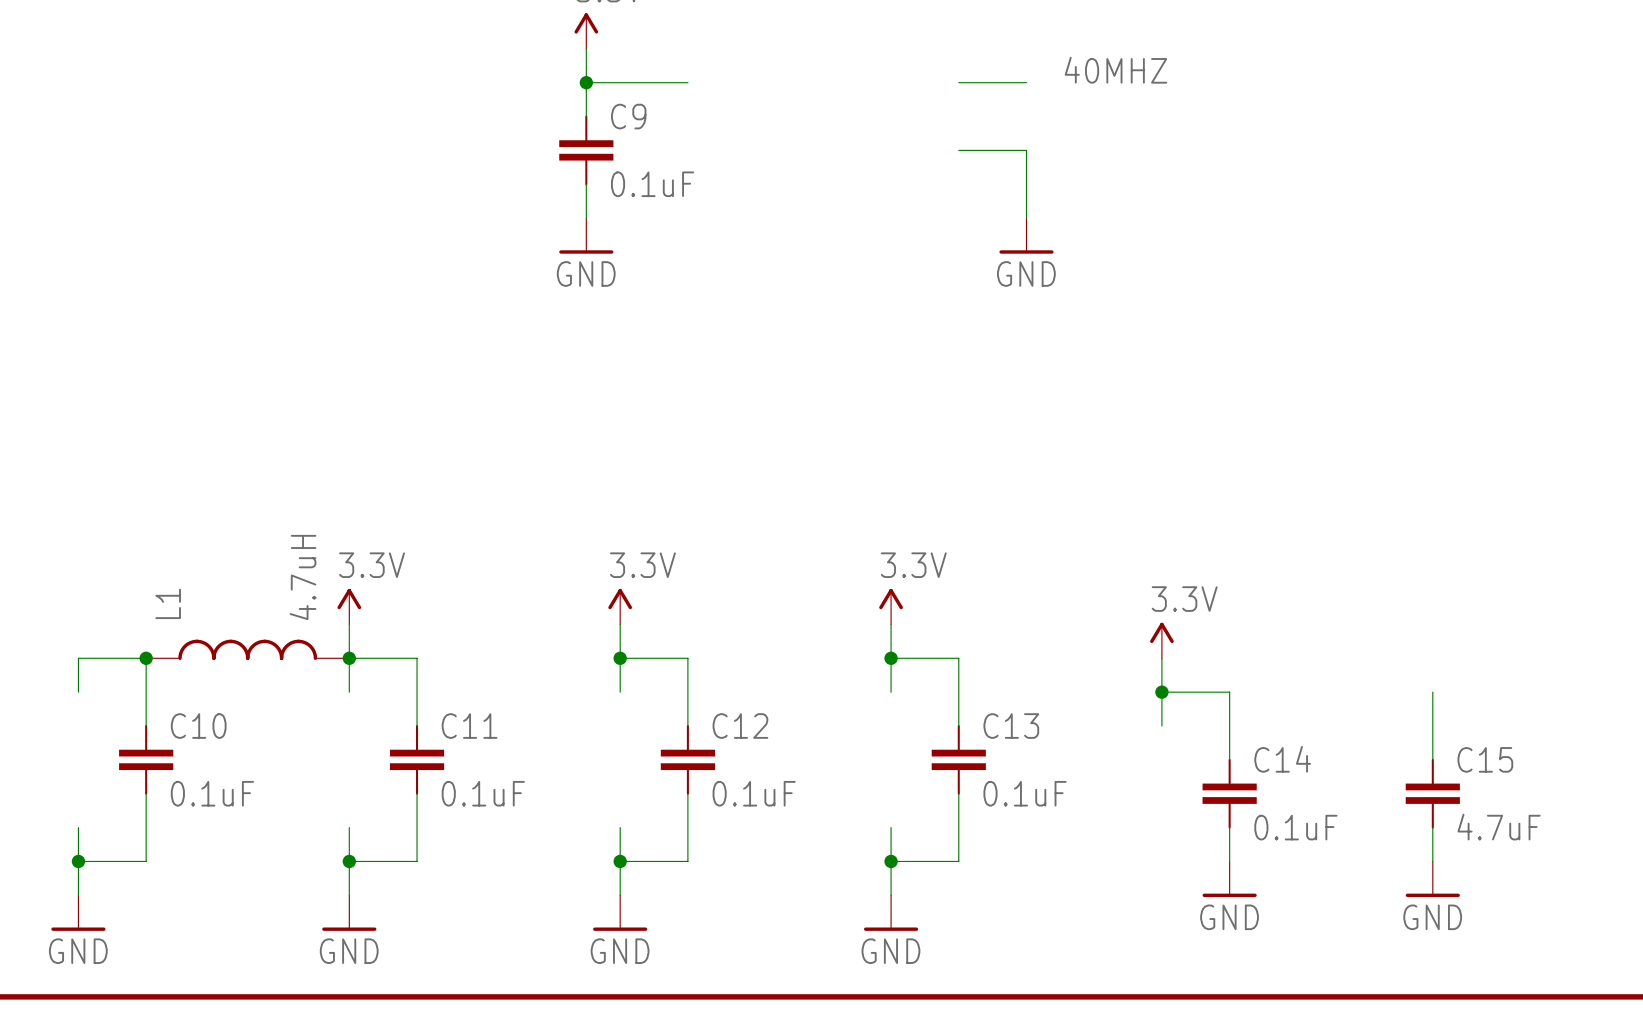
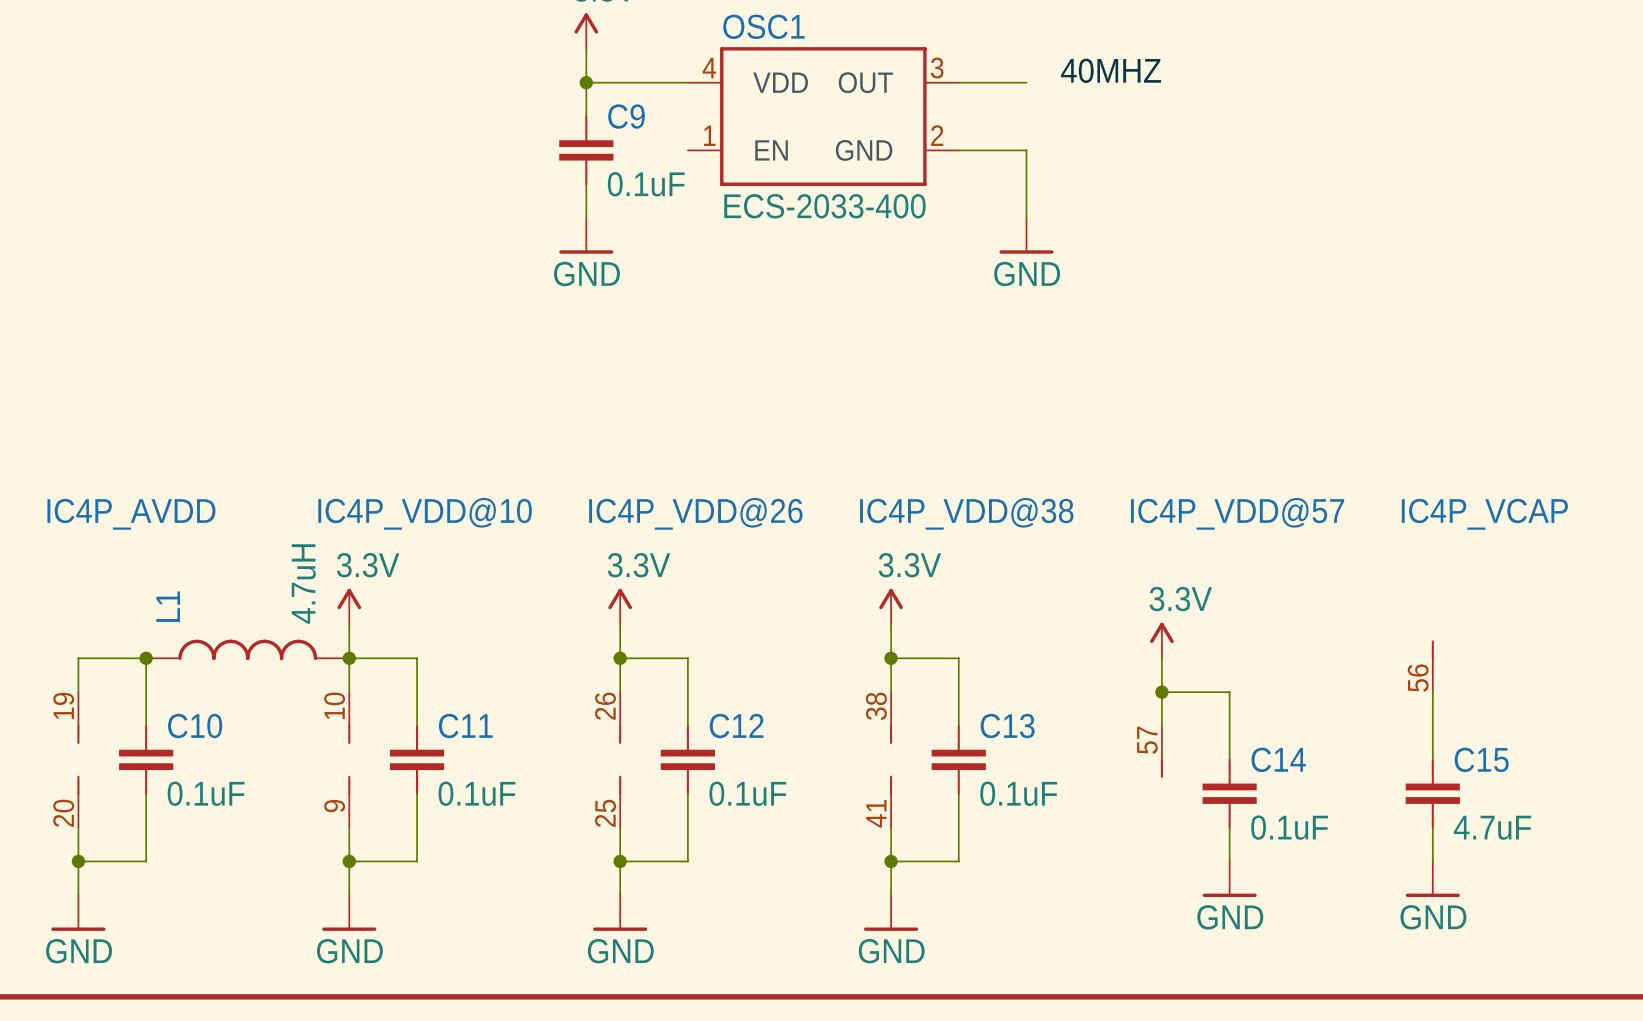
OSC1: none -> ECS-2033-400 (823, 116)
IC4P_VCAP: none -> (1432, 666)
IC4P_VDD@57: none -> (1161, 751)
IC4P_AVDD: none -> (78, 759)
IC4P_VDD@10: none -> (349, 759)
IC4P_VDD@26: none -> (620, 759)
IC4P_VDD@38: none -> (891, 759)

